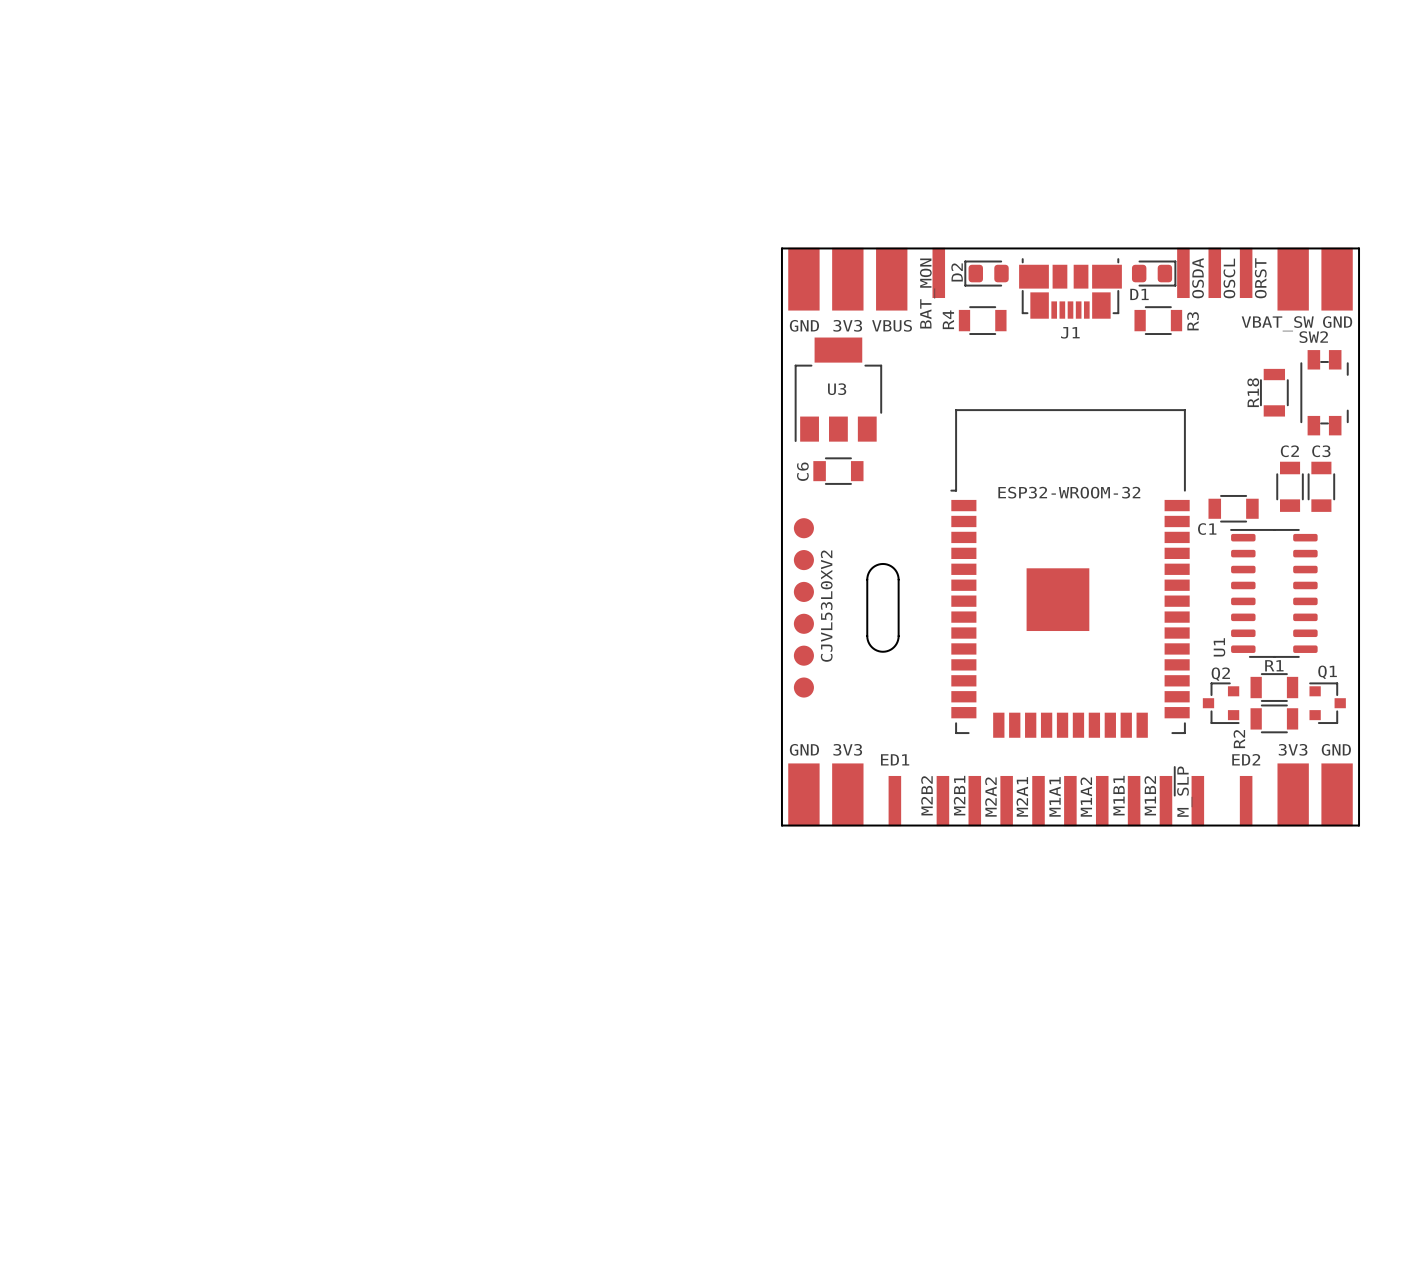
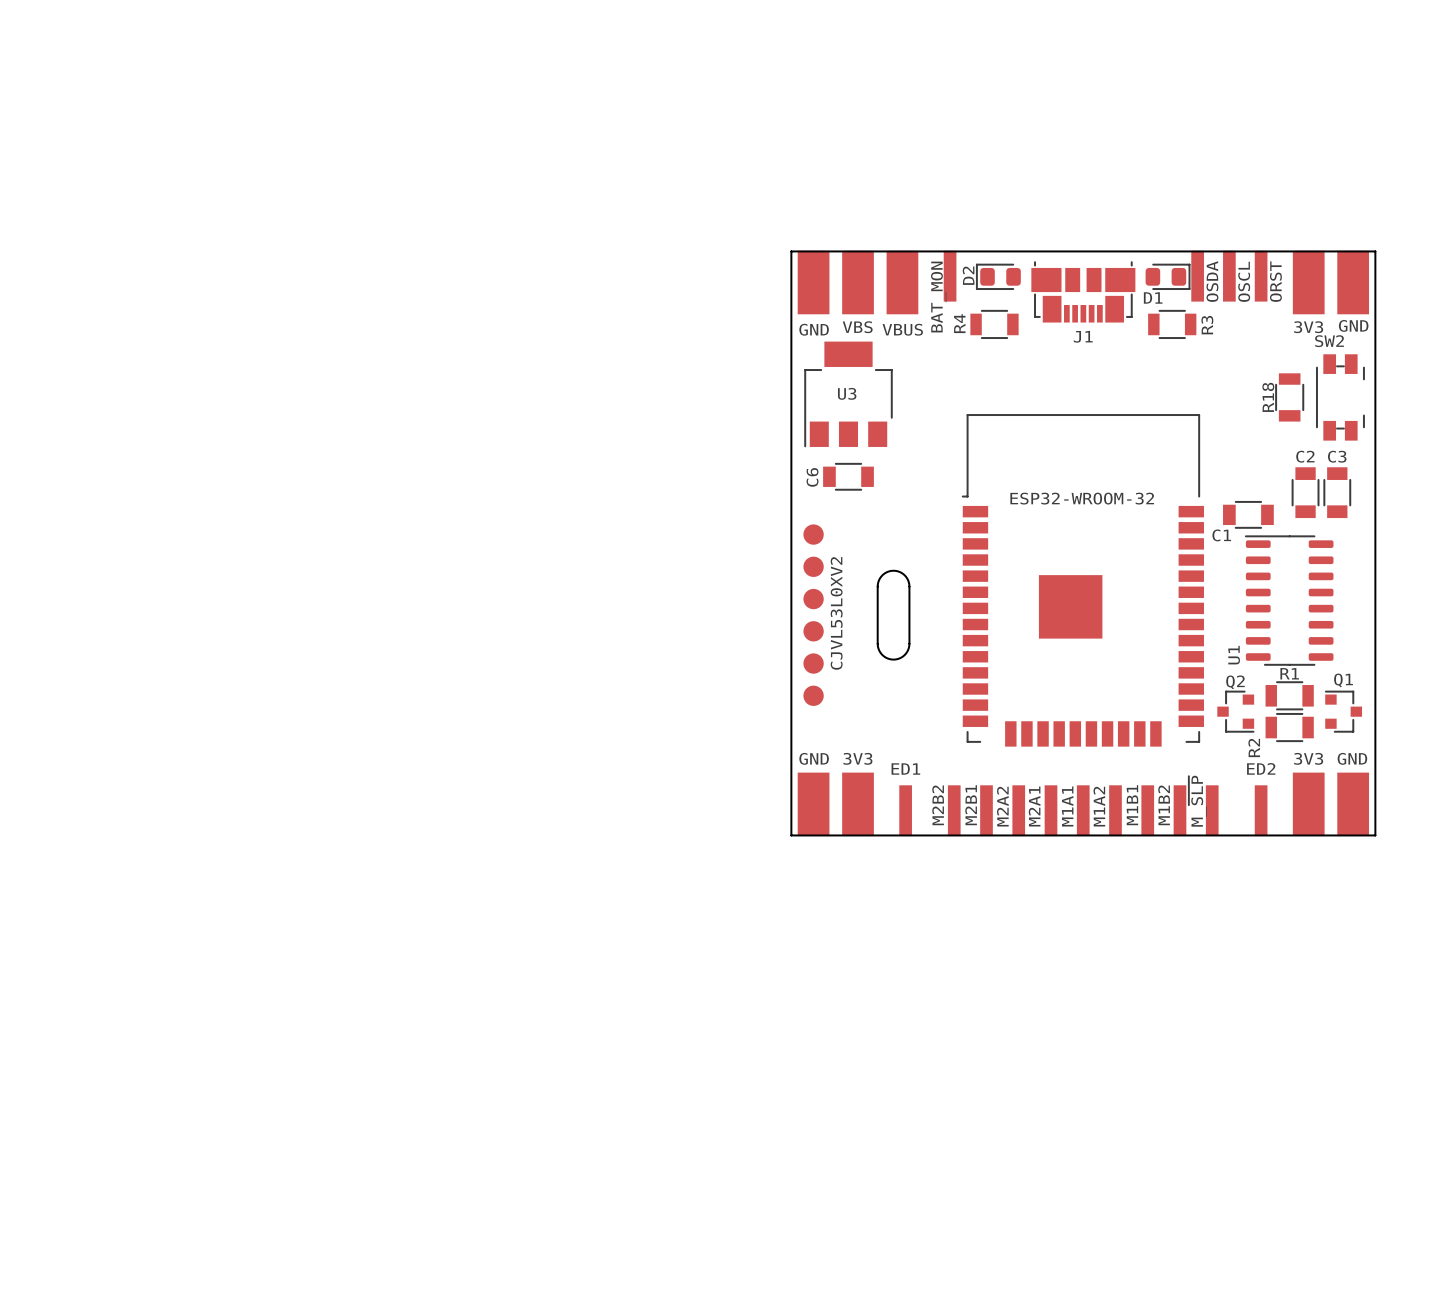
part value: VBAT_SW (1277, 323) -> 3V3 (1308, 327)
part value: 3V3 (847, 325) -> VBS (857, 327)

